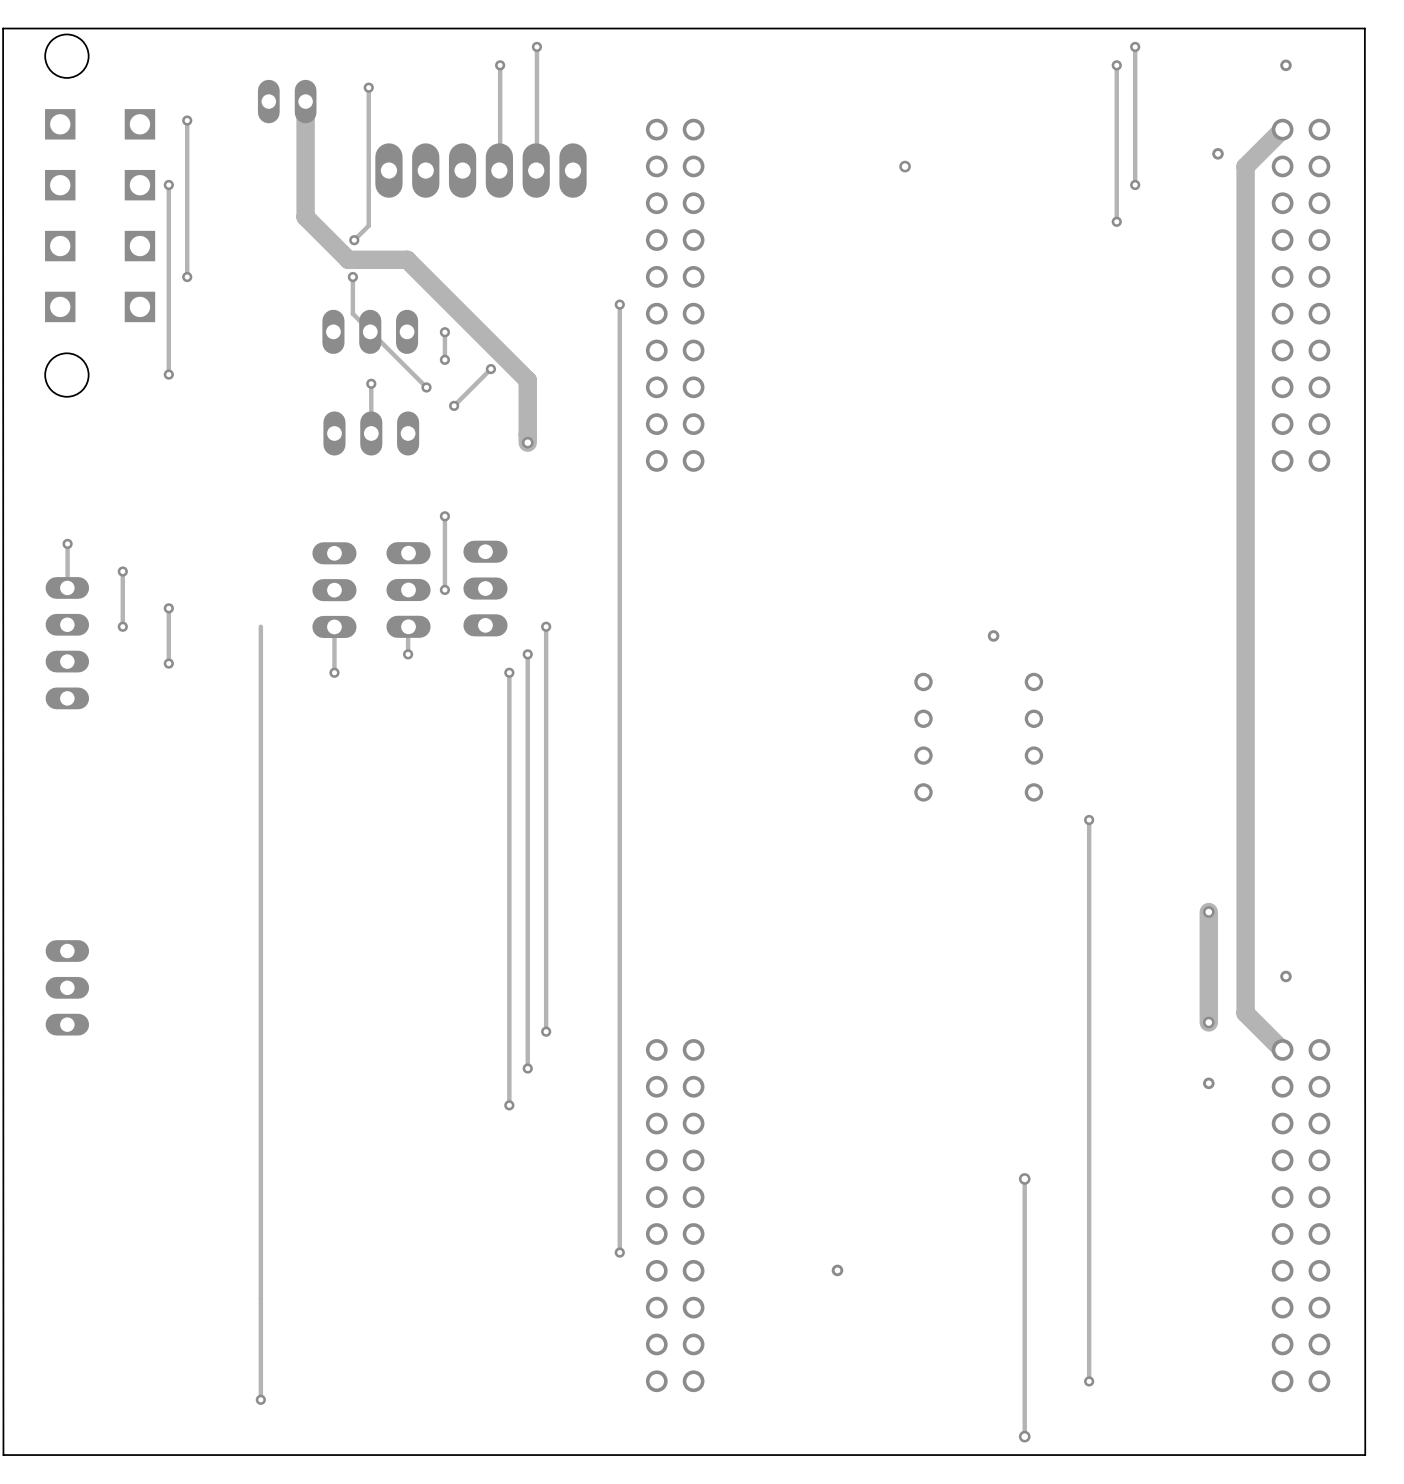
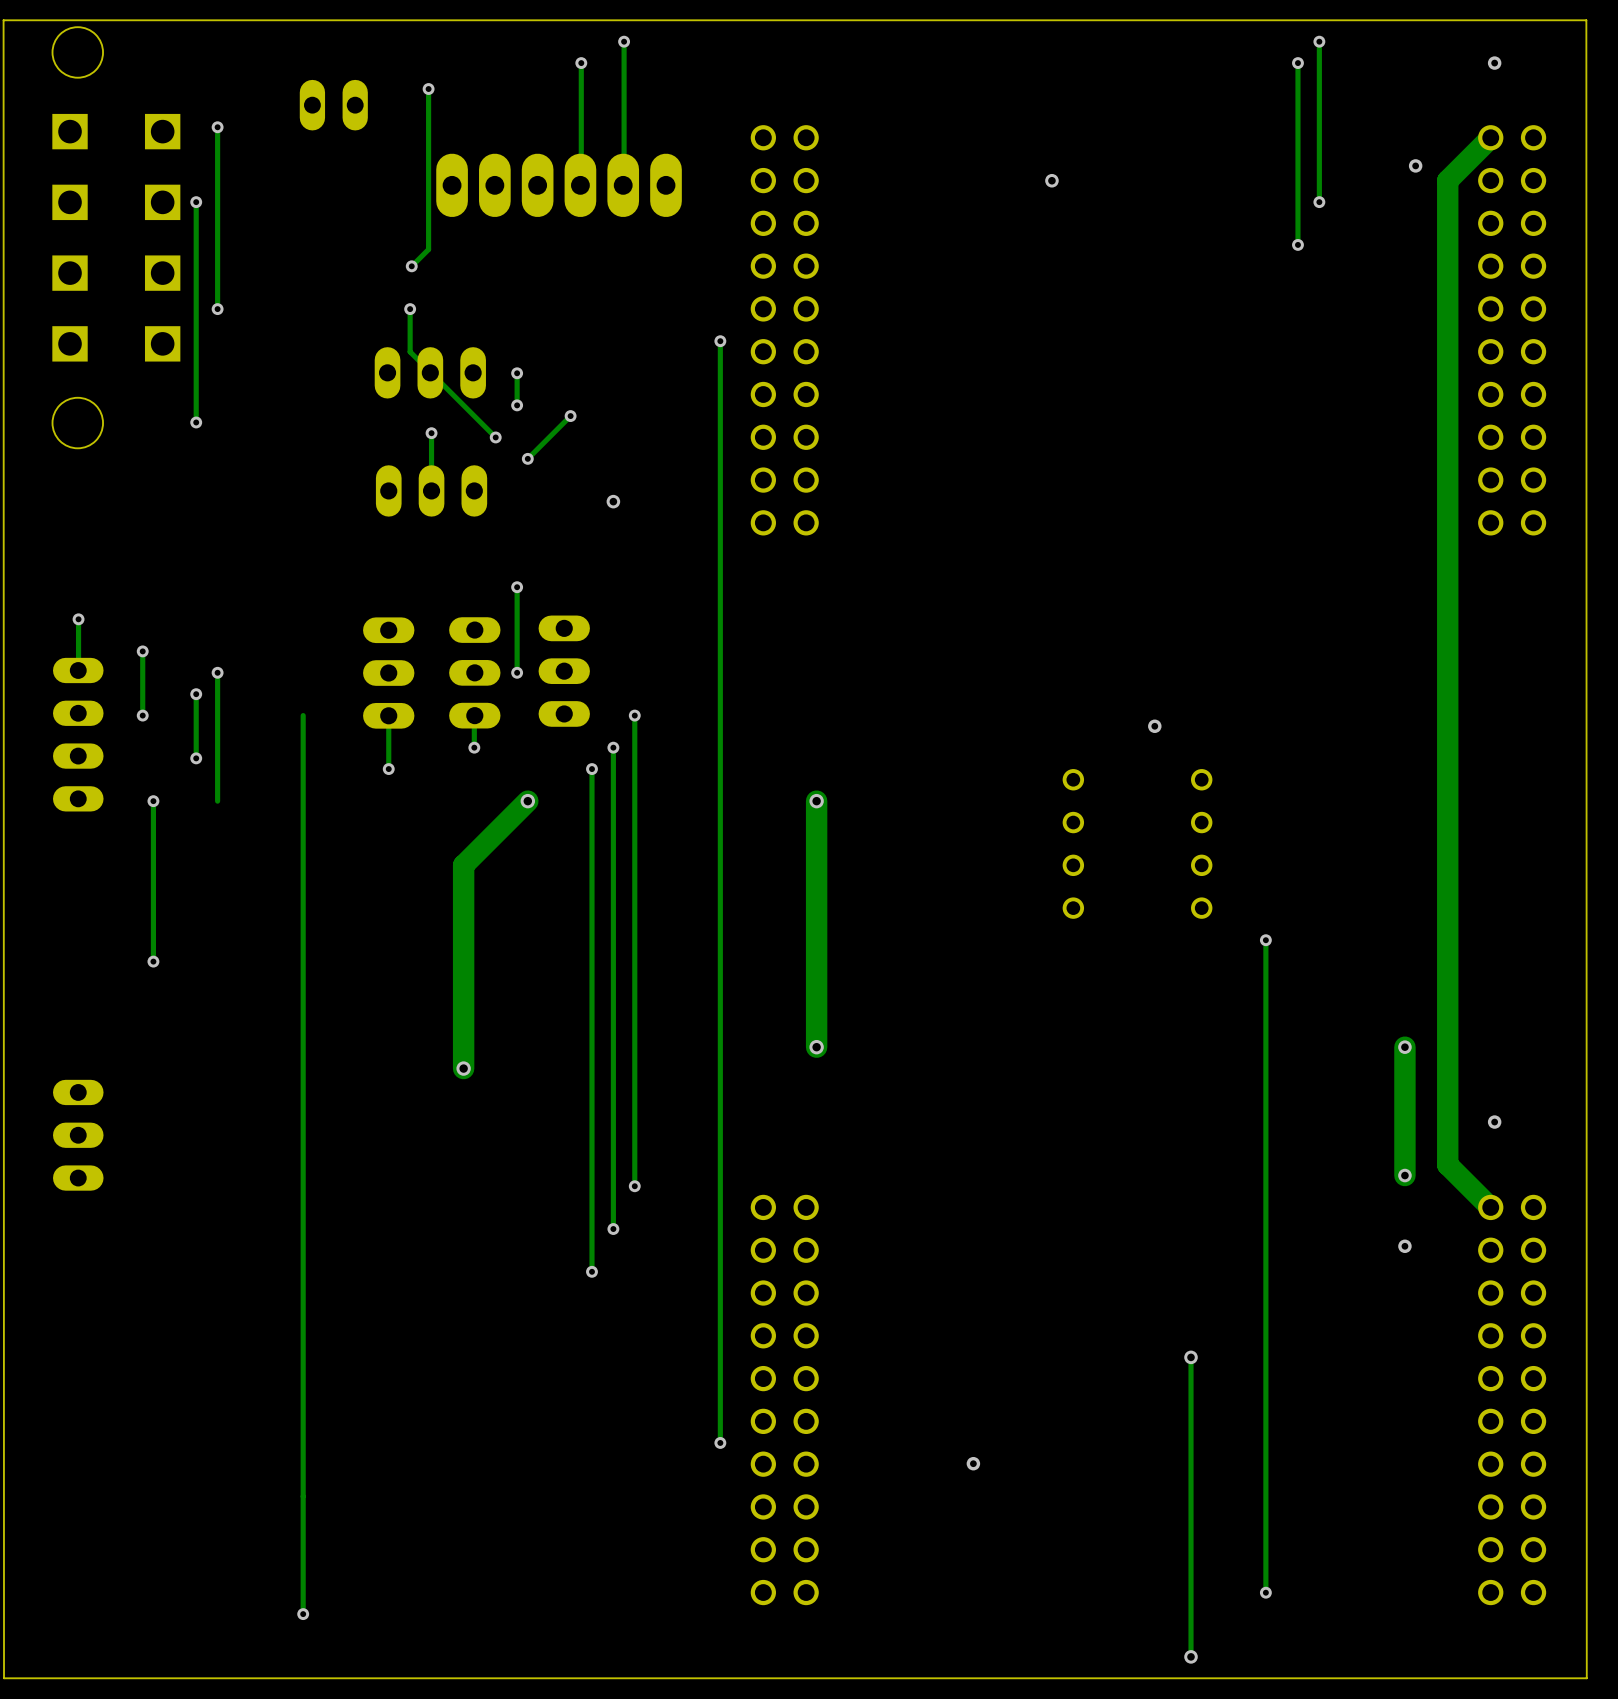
track: (305, 101) (305, 217) (348, 259) (407, 259) (527, 380) (527, 442) -> none
track: none -> (217, 672) (217, 801)
via: none -> (217, 672)
track: none -> (153, 801) (153, 961)
via: none -> (153, 801)
track: none -> (527, 801) (463, 865) (463, 1068)
via: none -> (527, 801)
track: none -> (816, 801) (816, 1047)
via: none -> (816, 801)
via: none -> (153, 961)
via: none -> (816, 1047)
via: none -> (463, 1068)

